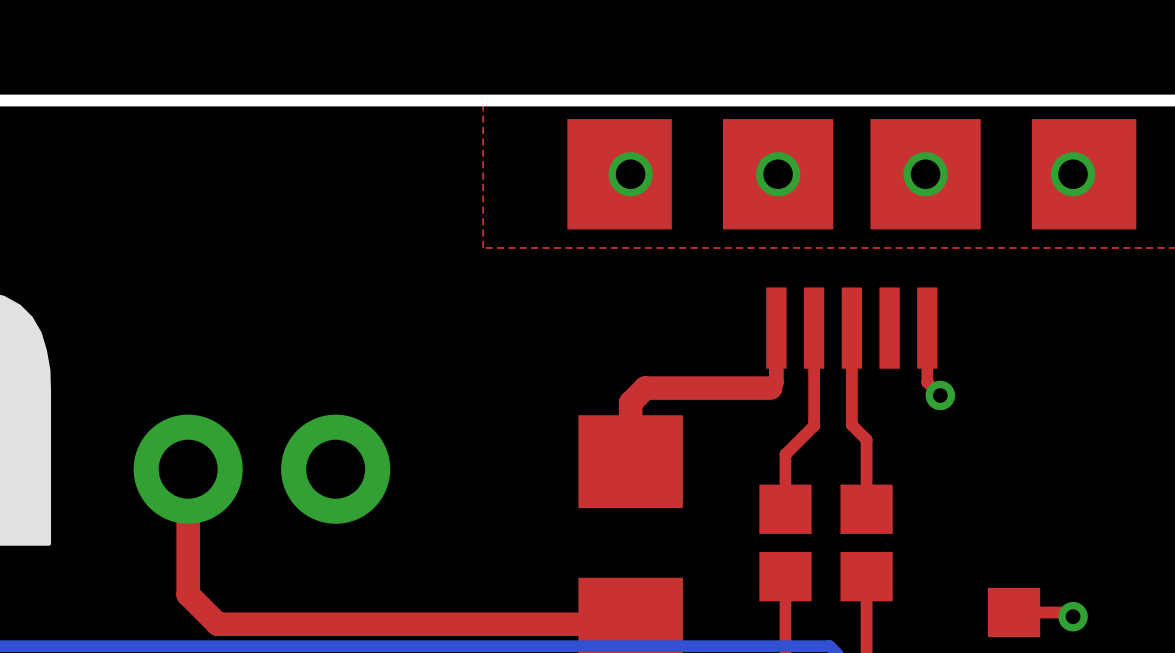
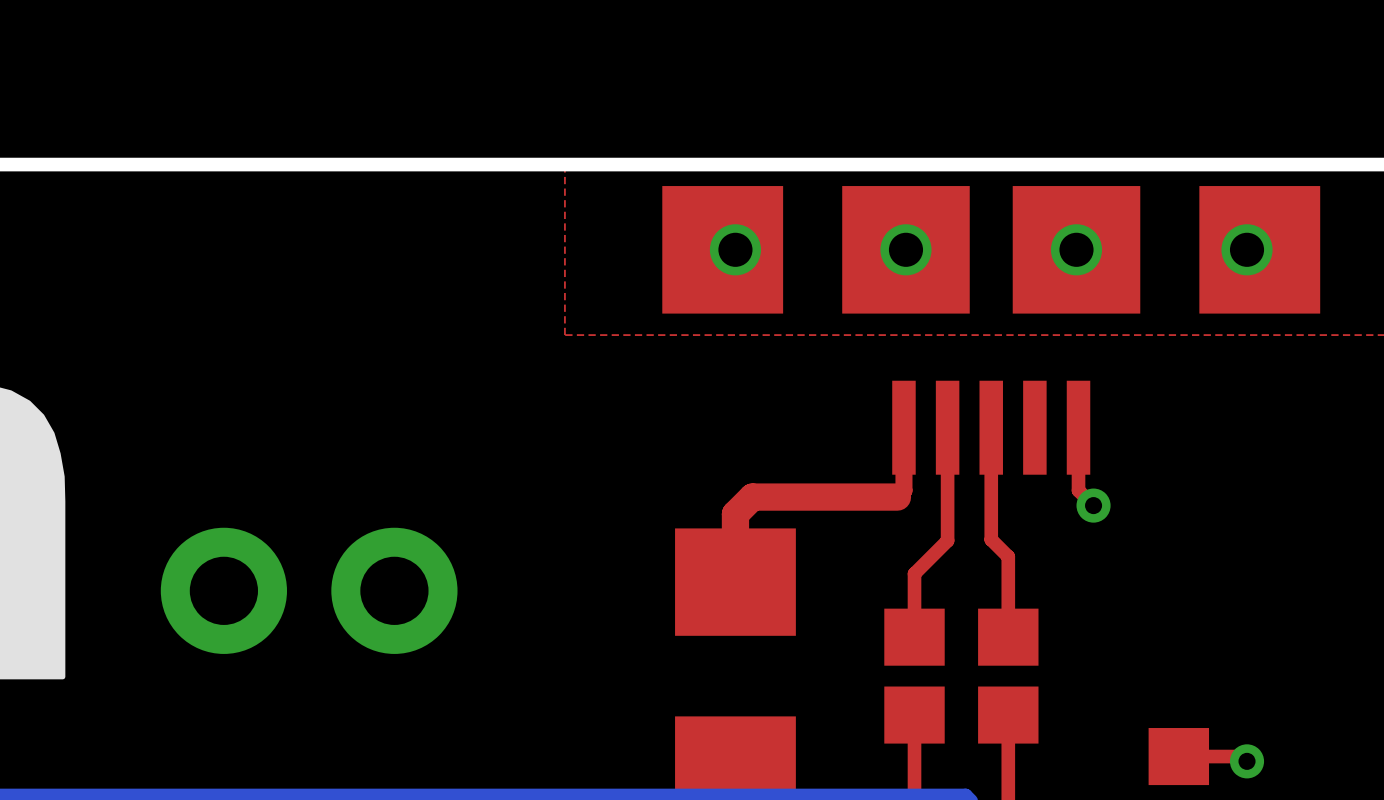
top track: (188, 469) (188, 594) (217, 624) (630, 624) -> none

